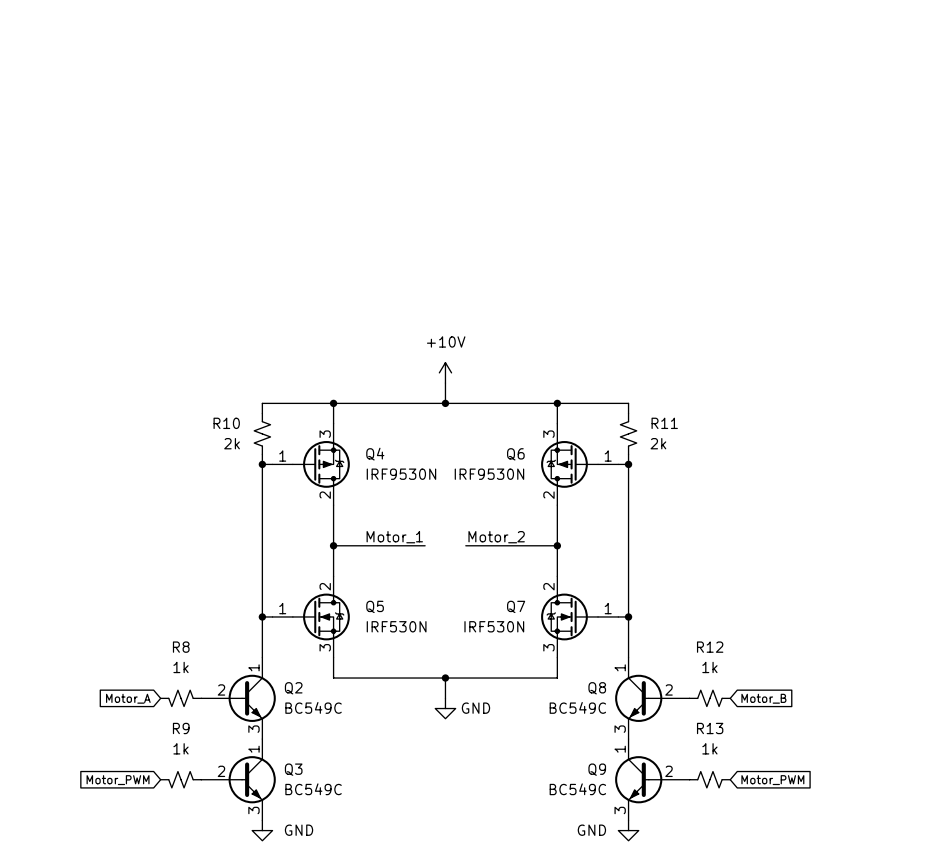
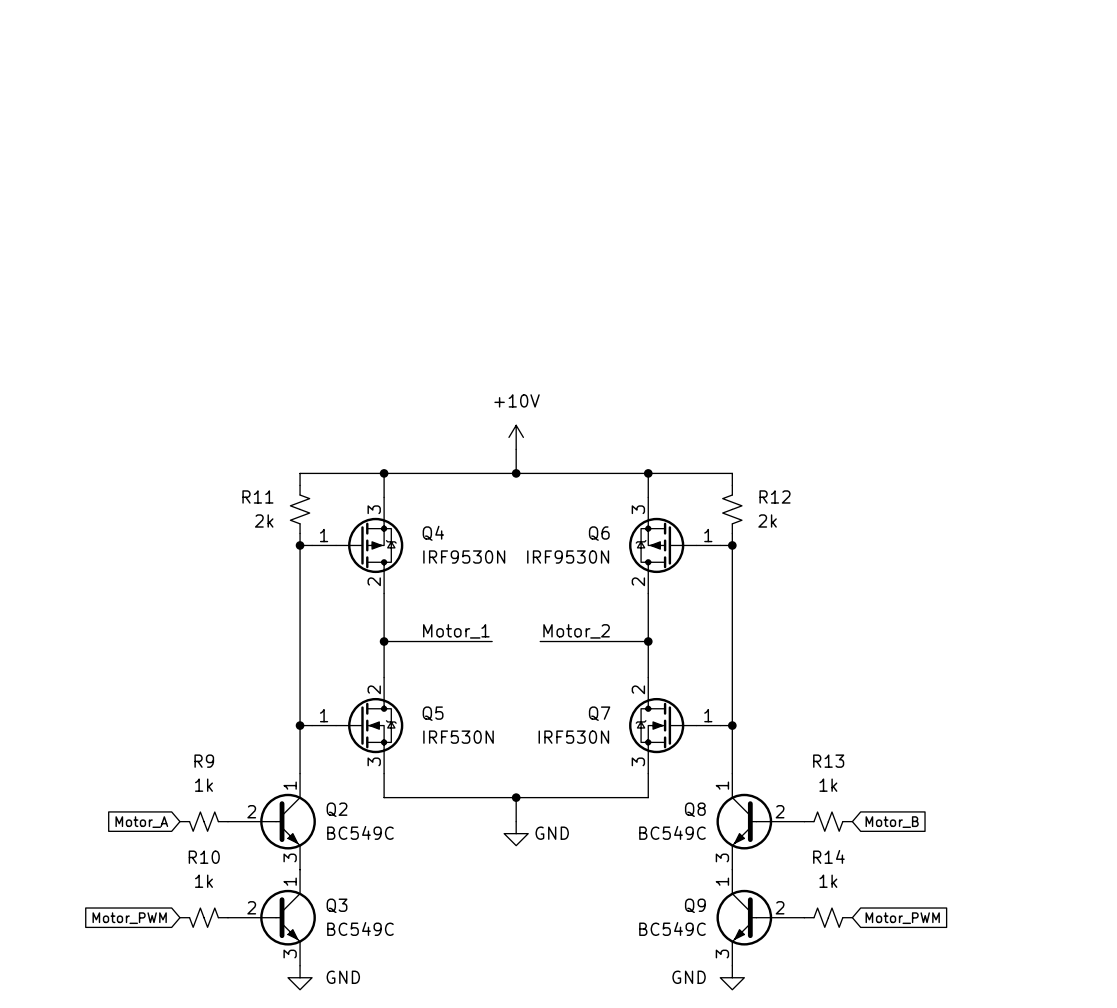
R10 name: R10 (226, 423) -> R11 (257, 496)
R11 name: R11 (664, 423) -> R12 (775, 496)
R8 name: R8 (181, 647) -> R9 (204, 761)
R12 name: R12 (710, 647) -> R13 (828, 761)
R9 name: R9 (181, 728) -> R10 (204, 857)
R13 name: R13 (710, 728) -> R14 (828, 856)

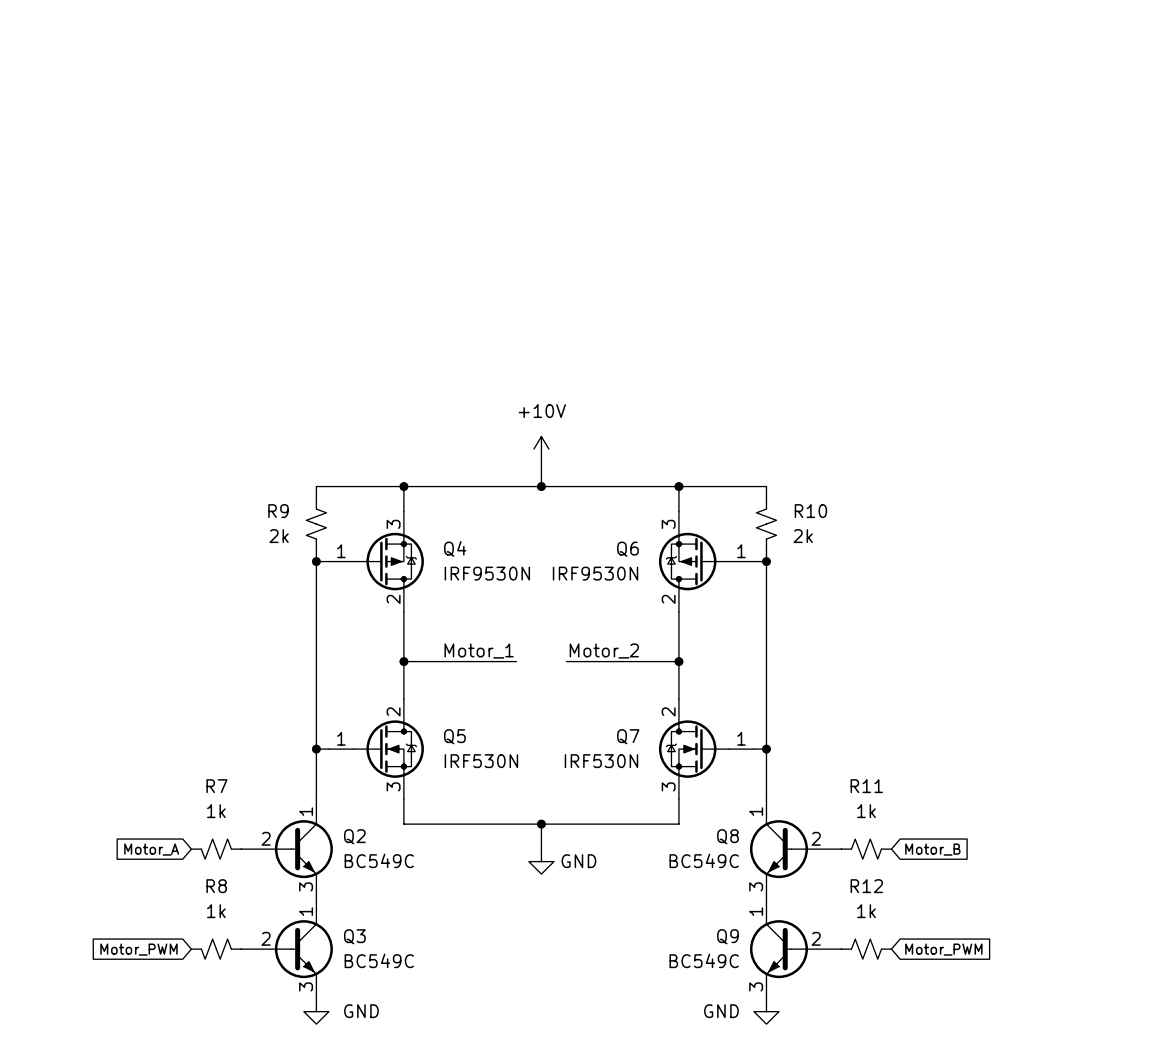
R11 name: R11 (257, 496) -> R9 (278, 511)
R12 name: R12 (775, 496) -> R10 (810, 511)
R9 name: R9 (204, 761) -> R7 (216, 786)
R13 name: R13 (828, 761) -> R11 (866, 786)
R14 name: R14 (828, 856) -> R12 (866, 886)
R10 name: R10 (204, 857) -> R8 (216, 886)

